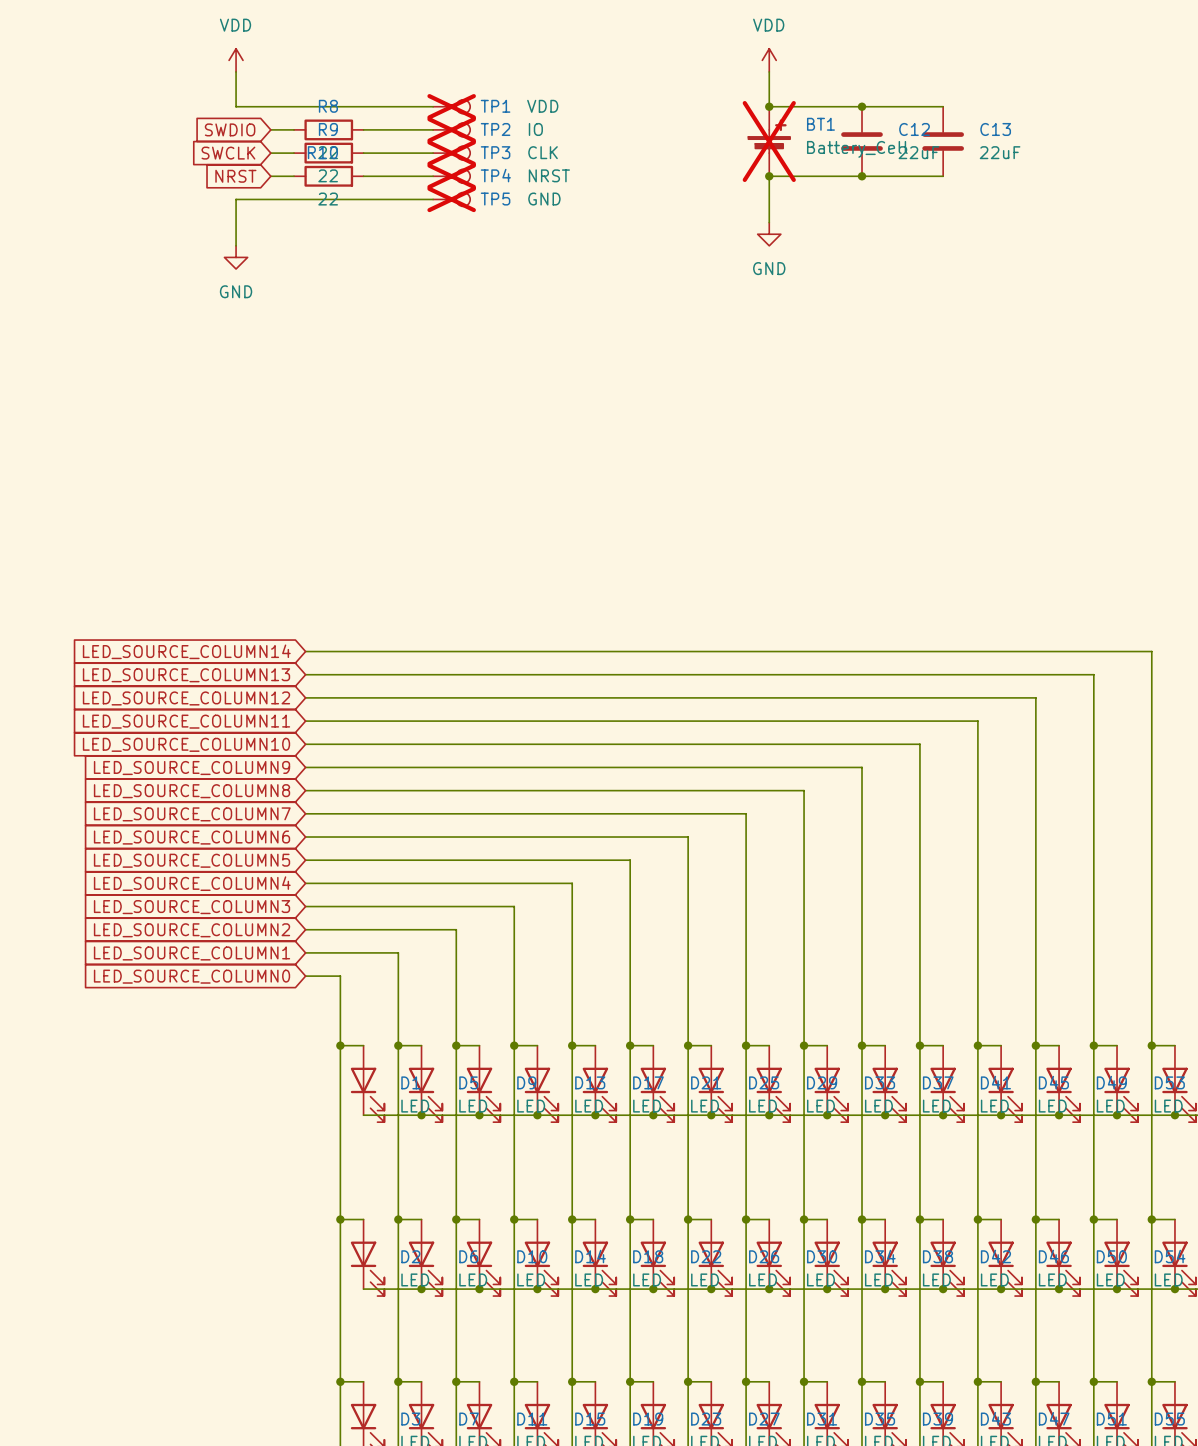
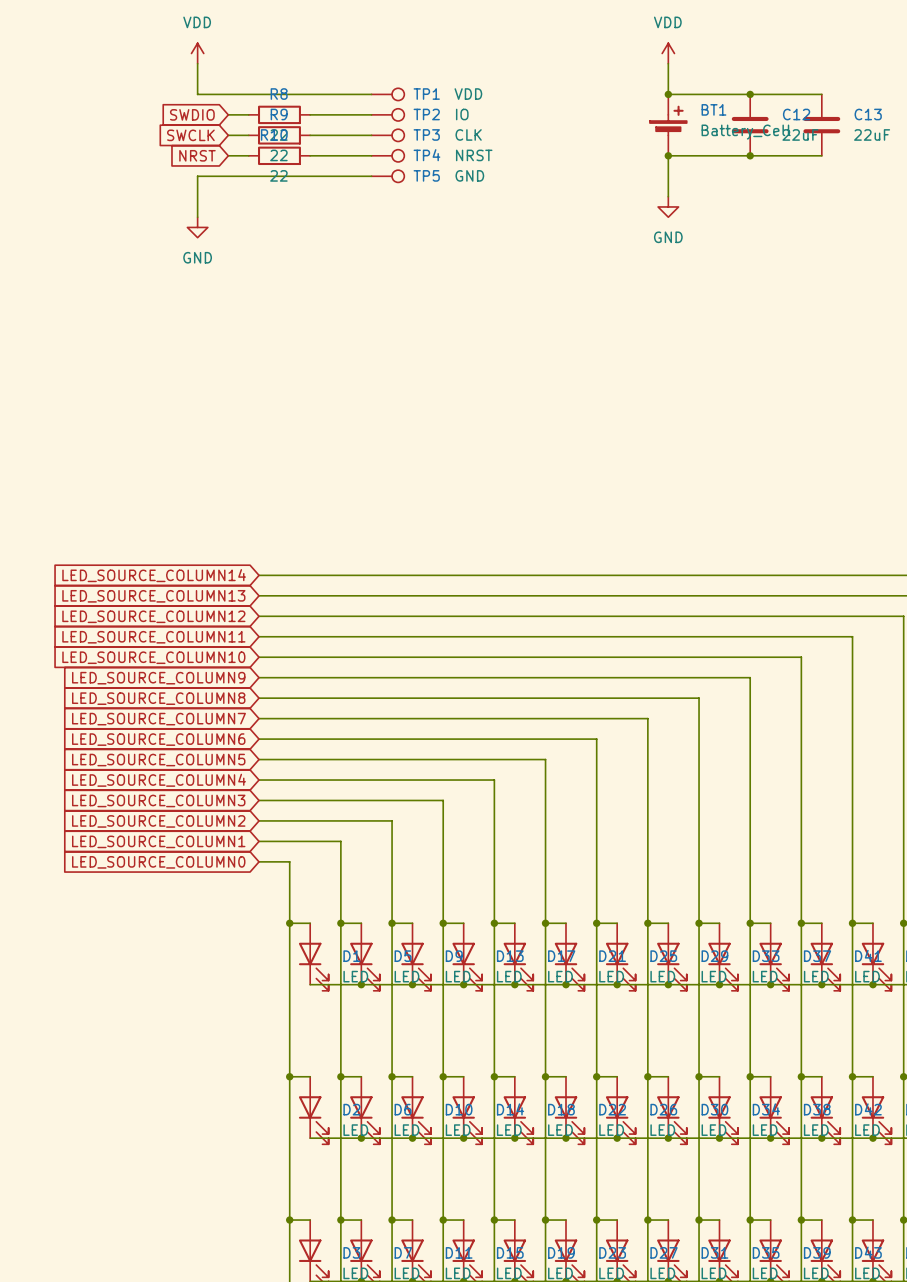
TP1 do-not-place cross: (451, 106) -> none
TP2 do-not-place cross: (451, 129) -> none
BT1 do-not-place cross: (769, 141) -> none
TP3 do-not-place cross: (451, 153) -> none
TP4 do-not-place cross: (451, 176) -> none
TP5 do-not-place cross: (451, 199) -> none

